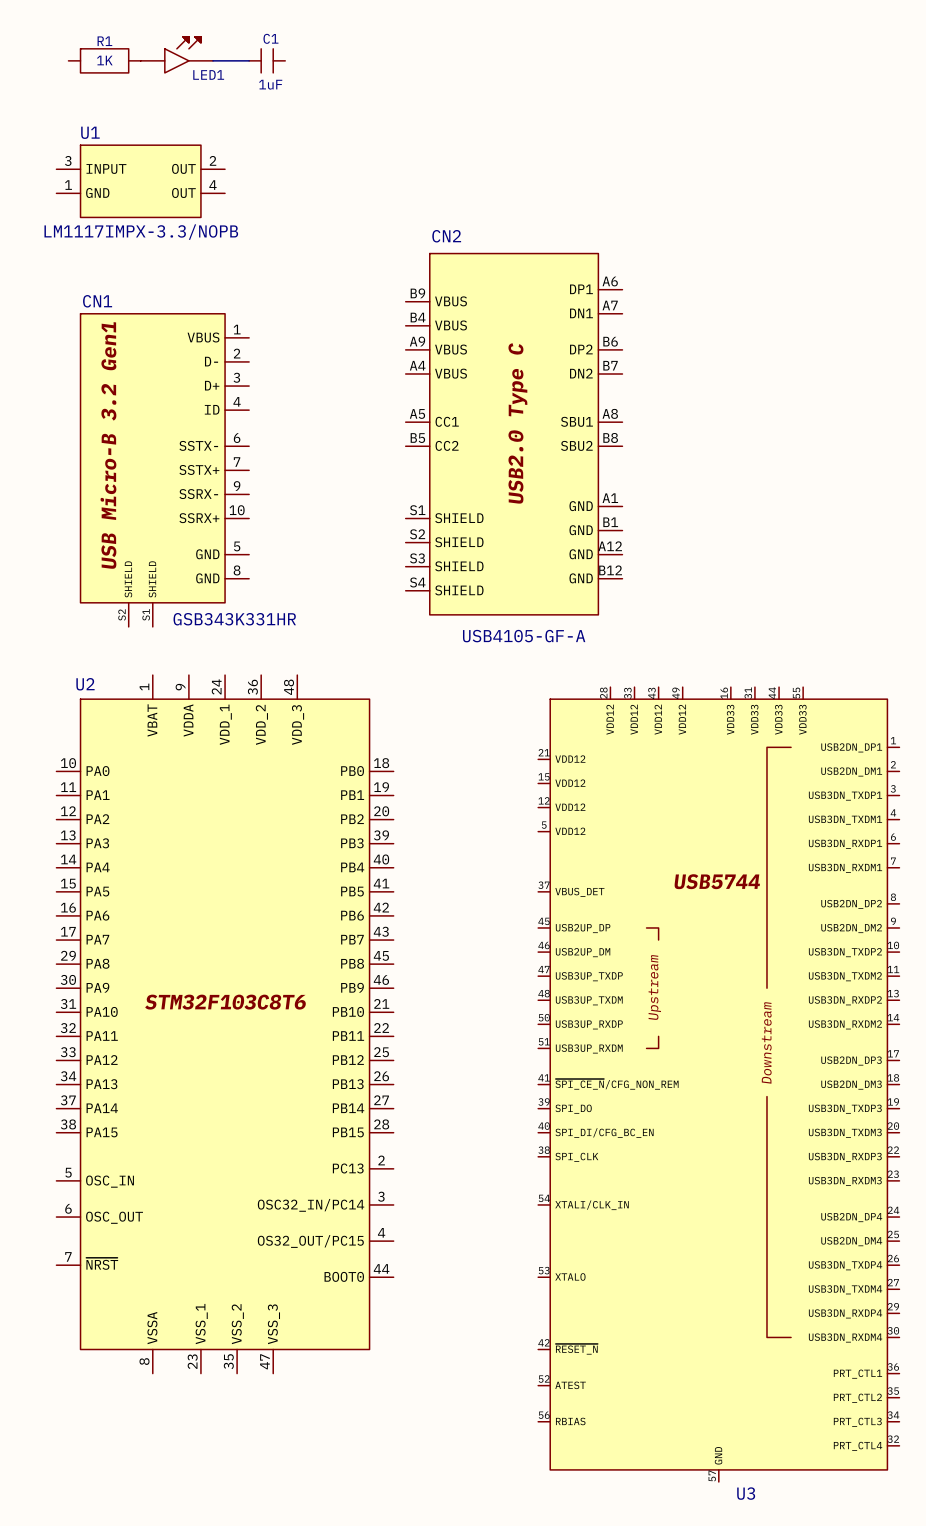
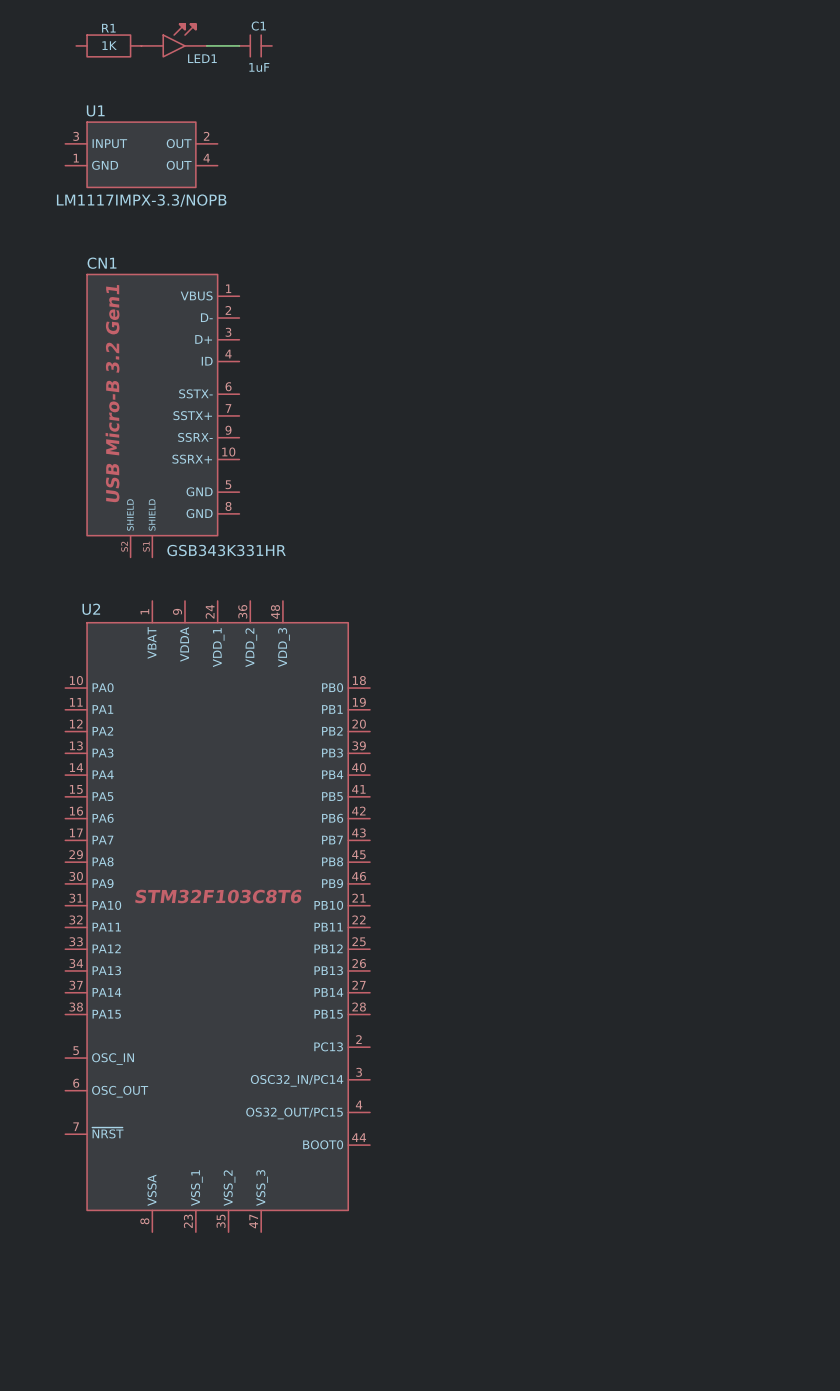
CN2: USB4105-GF-A (514, 434) -> none
U3: (718, 1084) -> none

